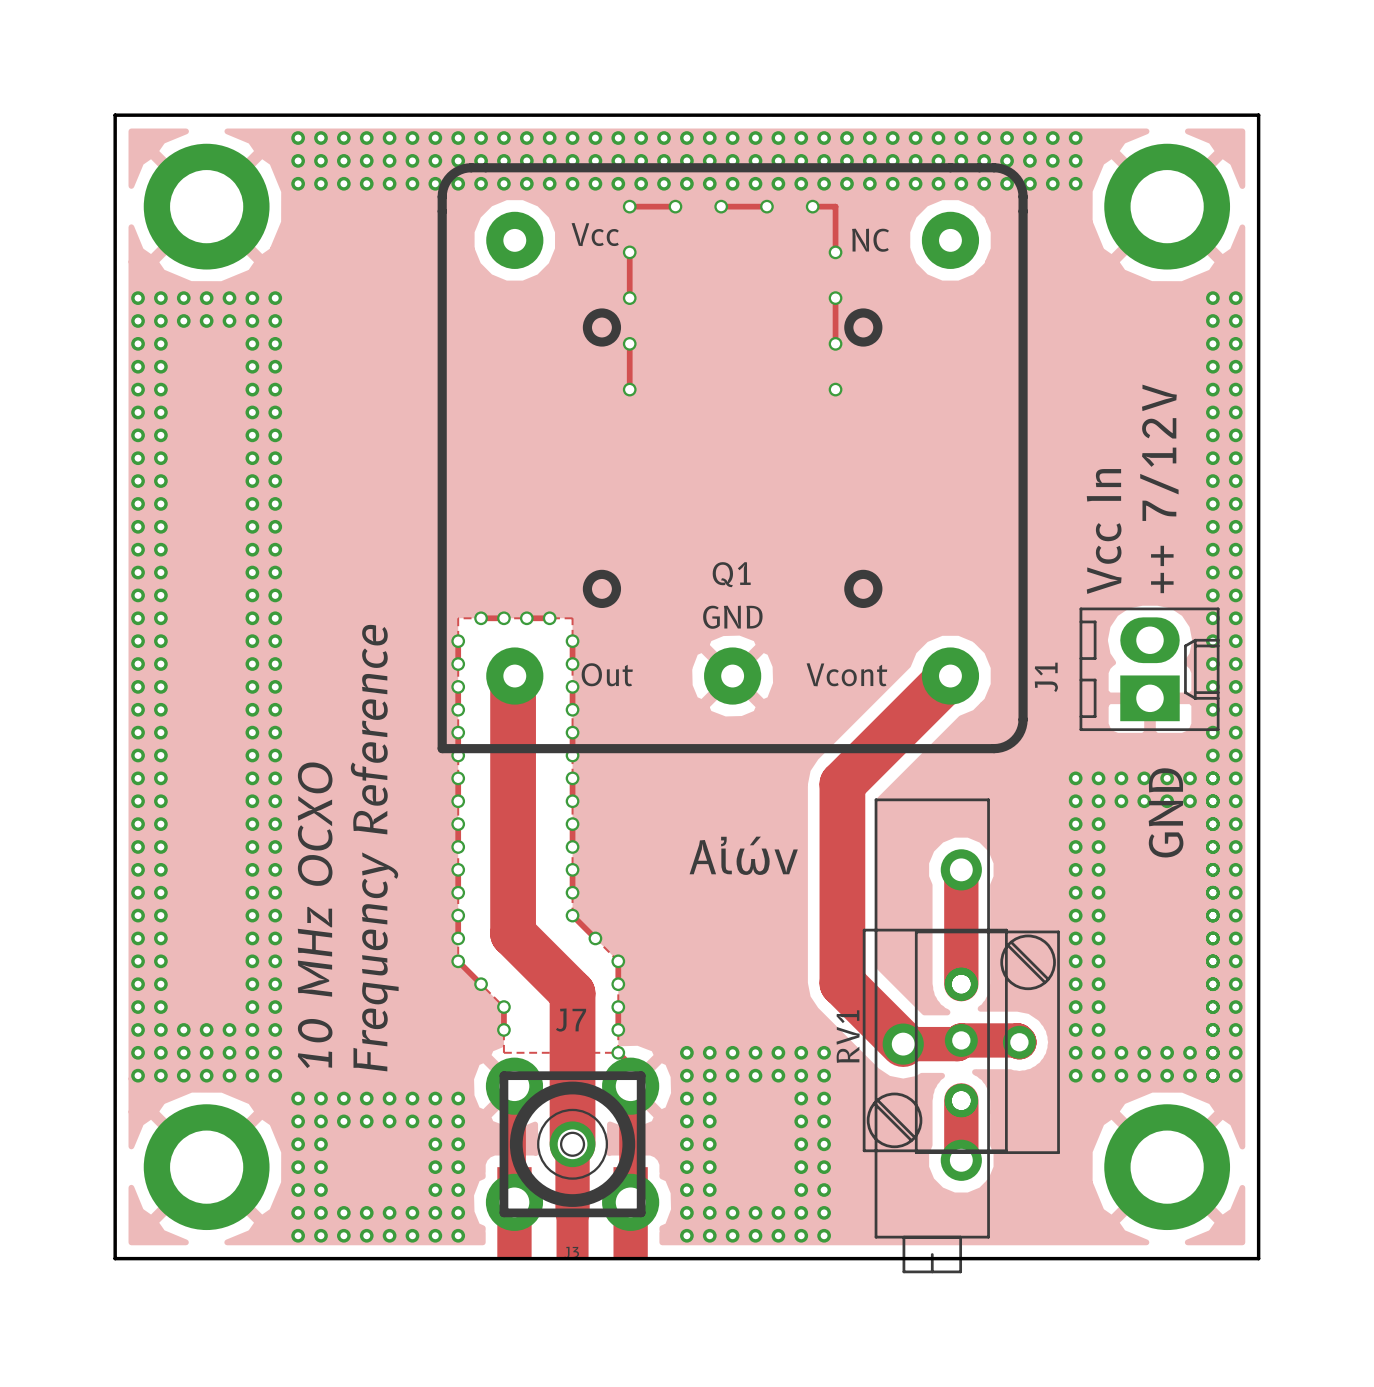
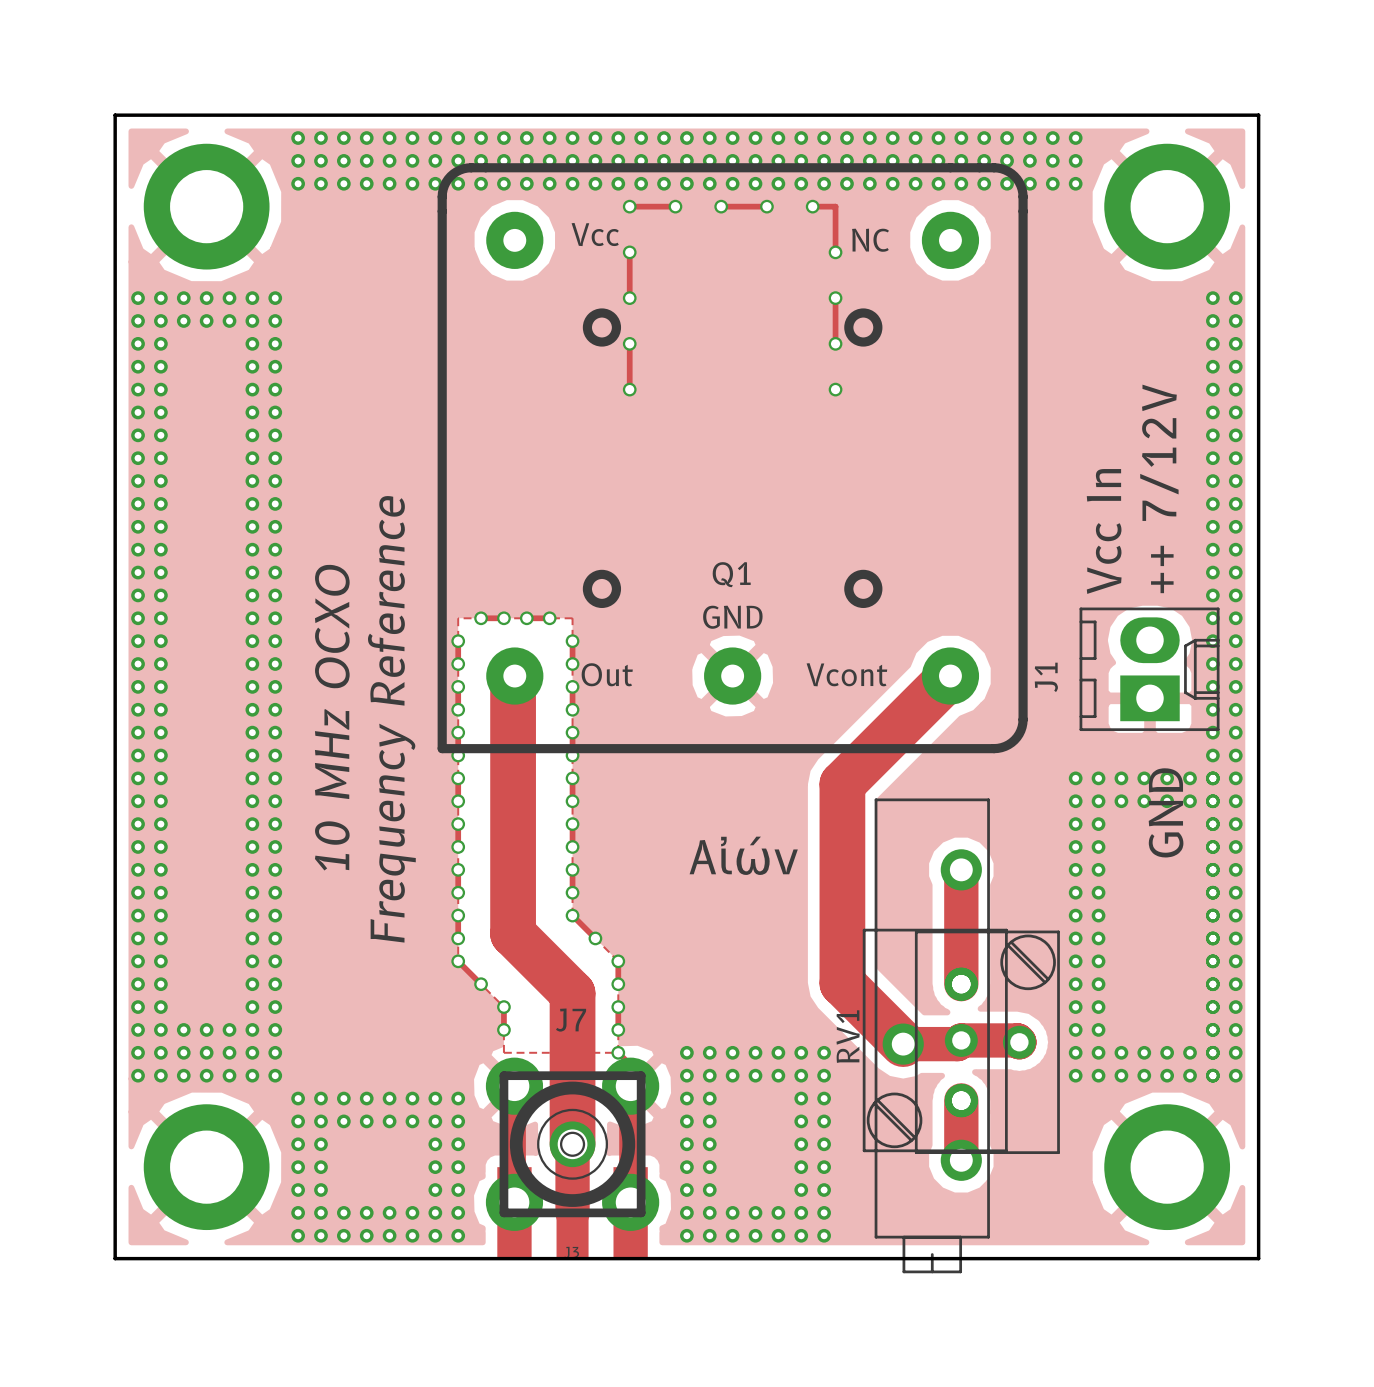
text position: Frequency Reference (374, 848) -> Frequency Reference (391, 719)
text position: 10 MHz OCXO (315, 915) -> 10 MHz OCXO (332, 717)

